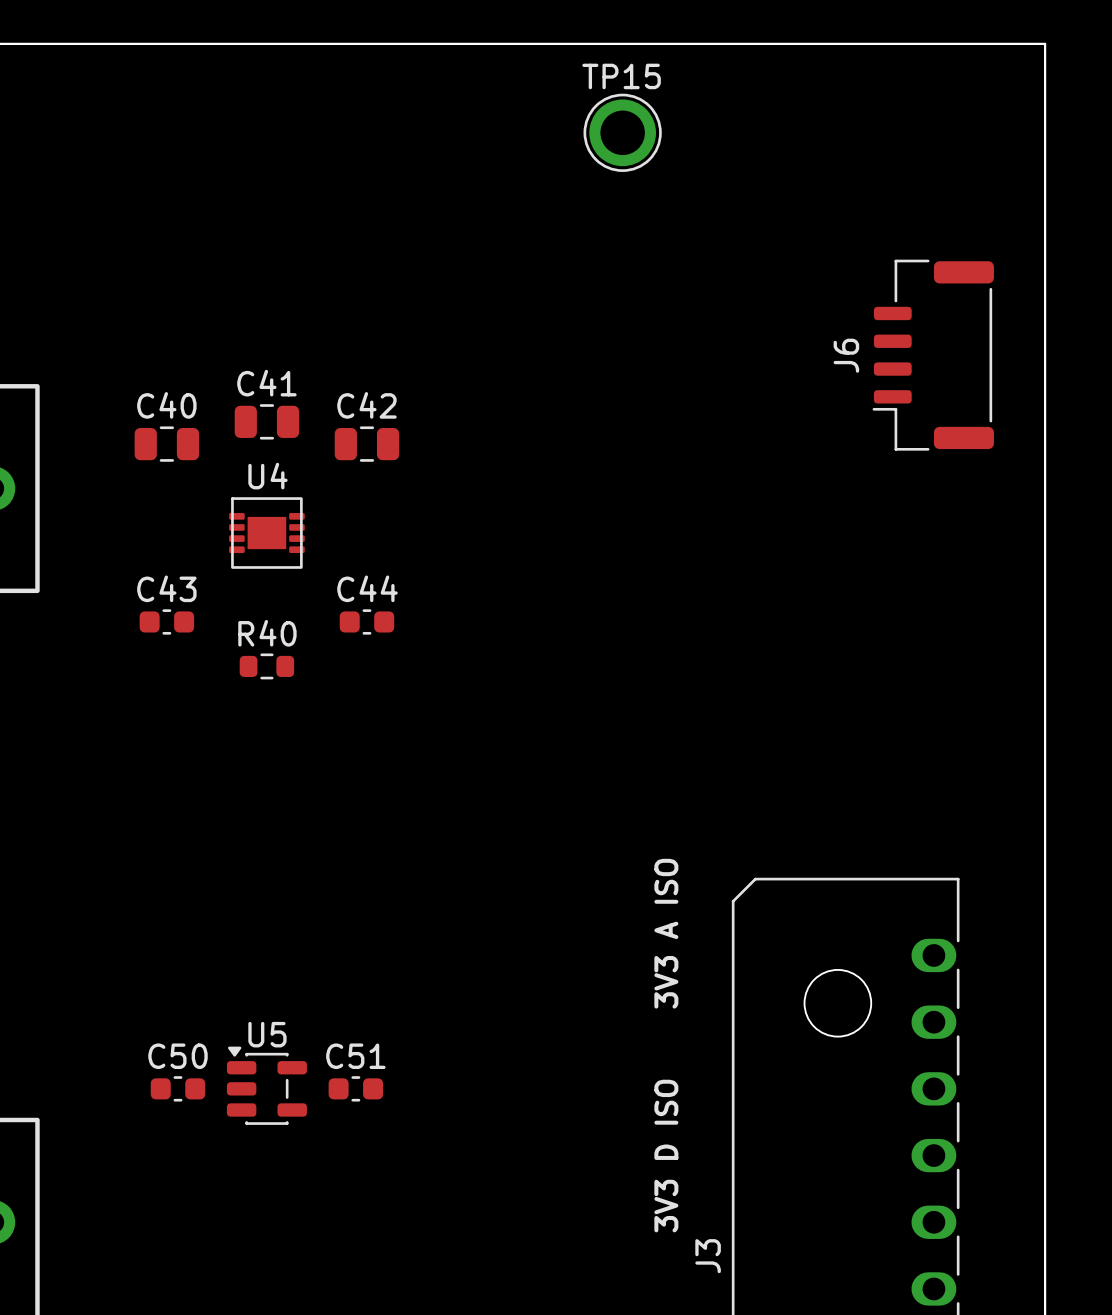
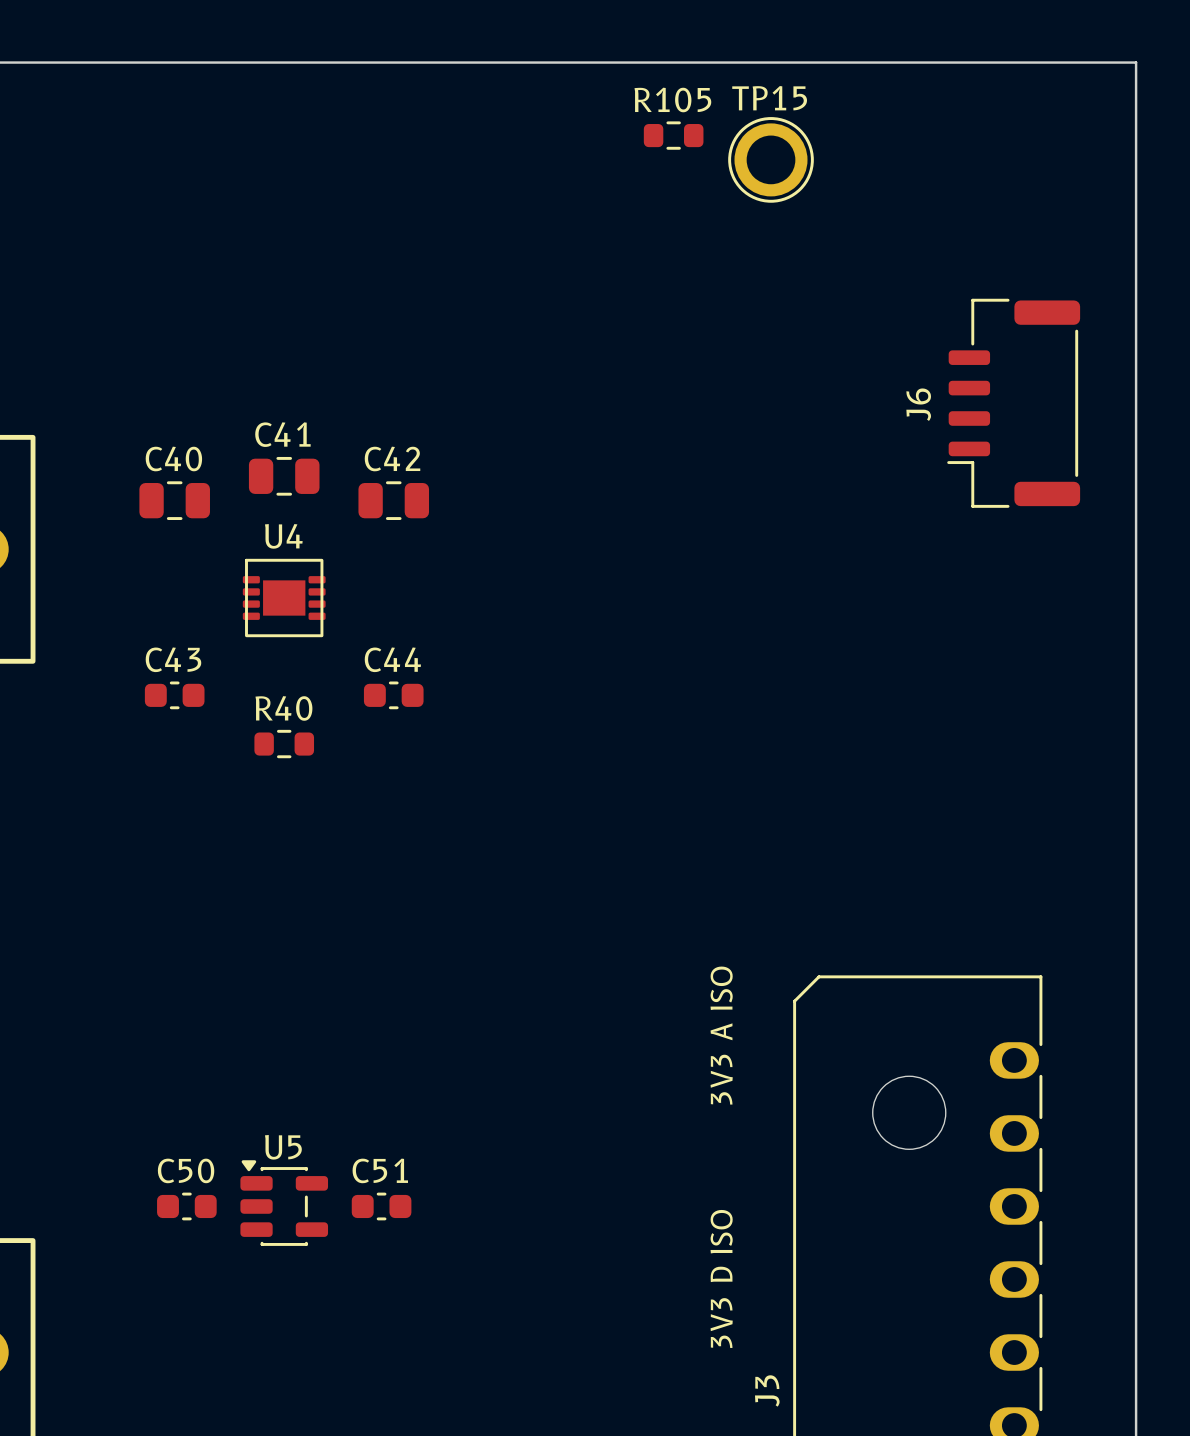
R105: none -> (673, 135)
TP15 position: (622, 132) -> (771, 159)

